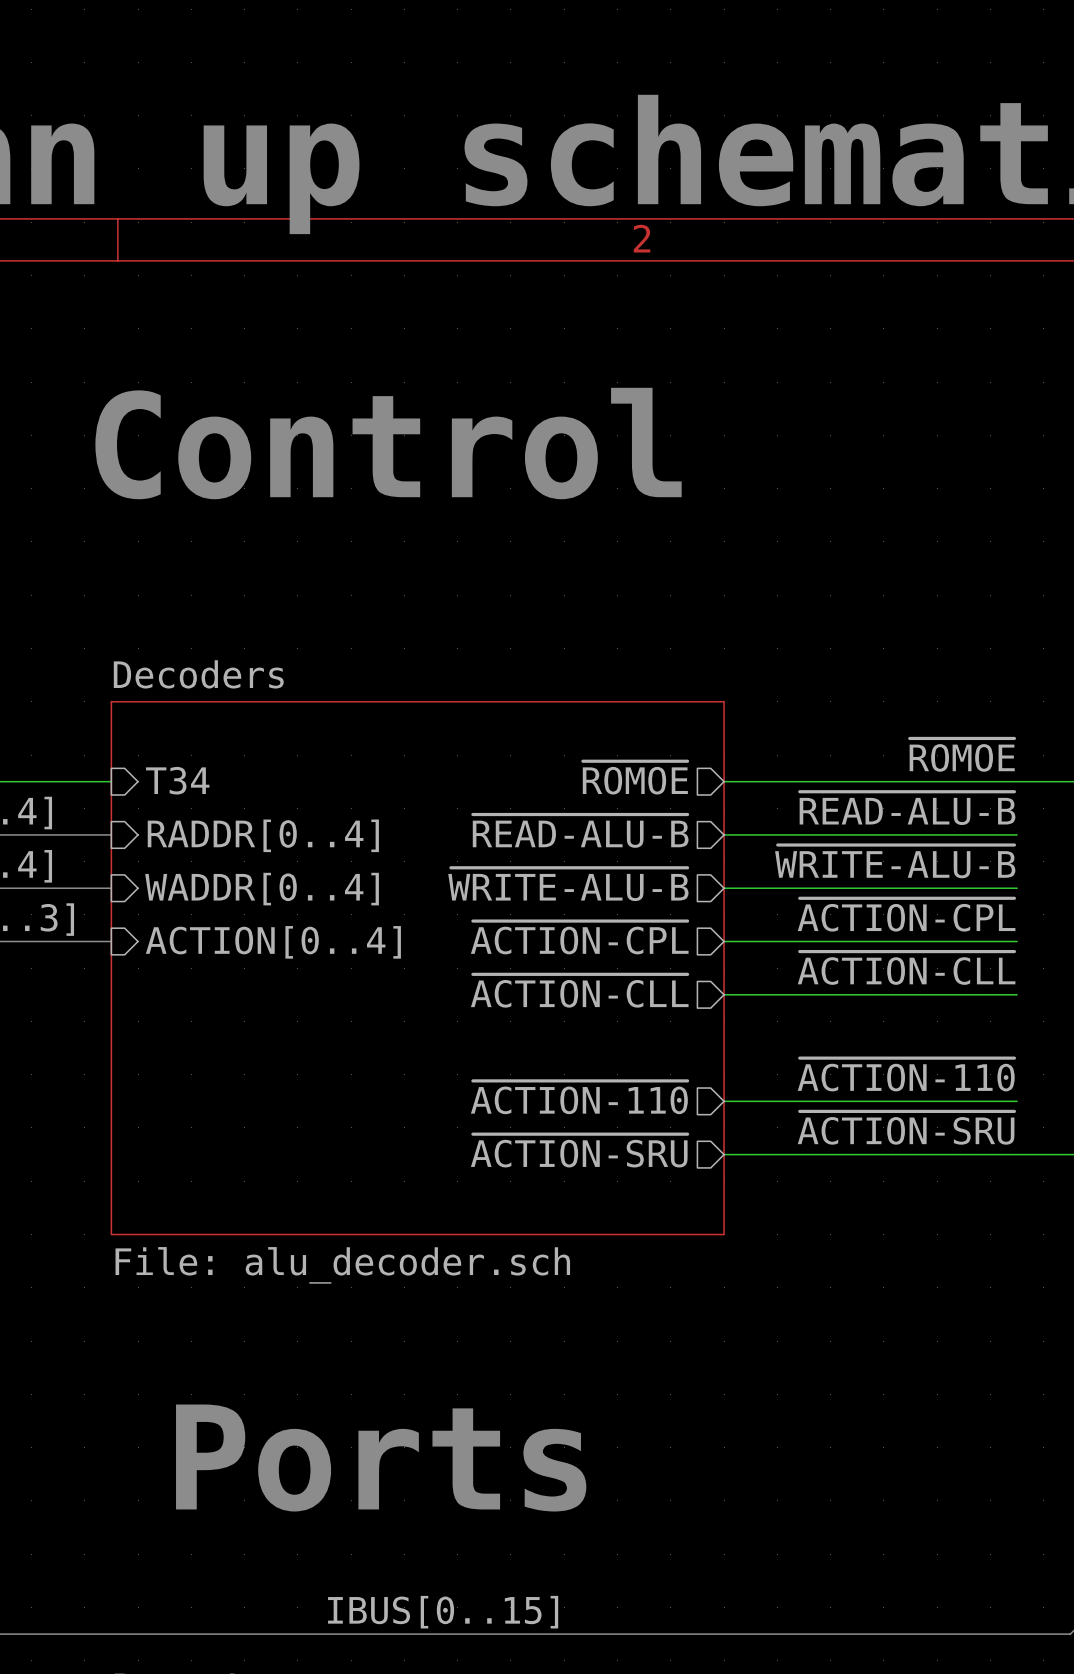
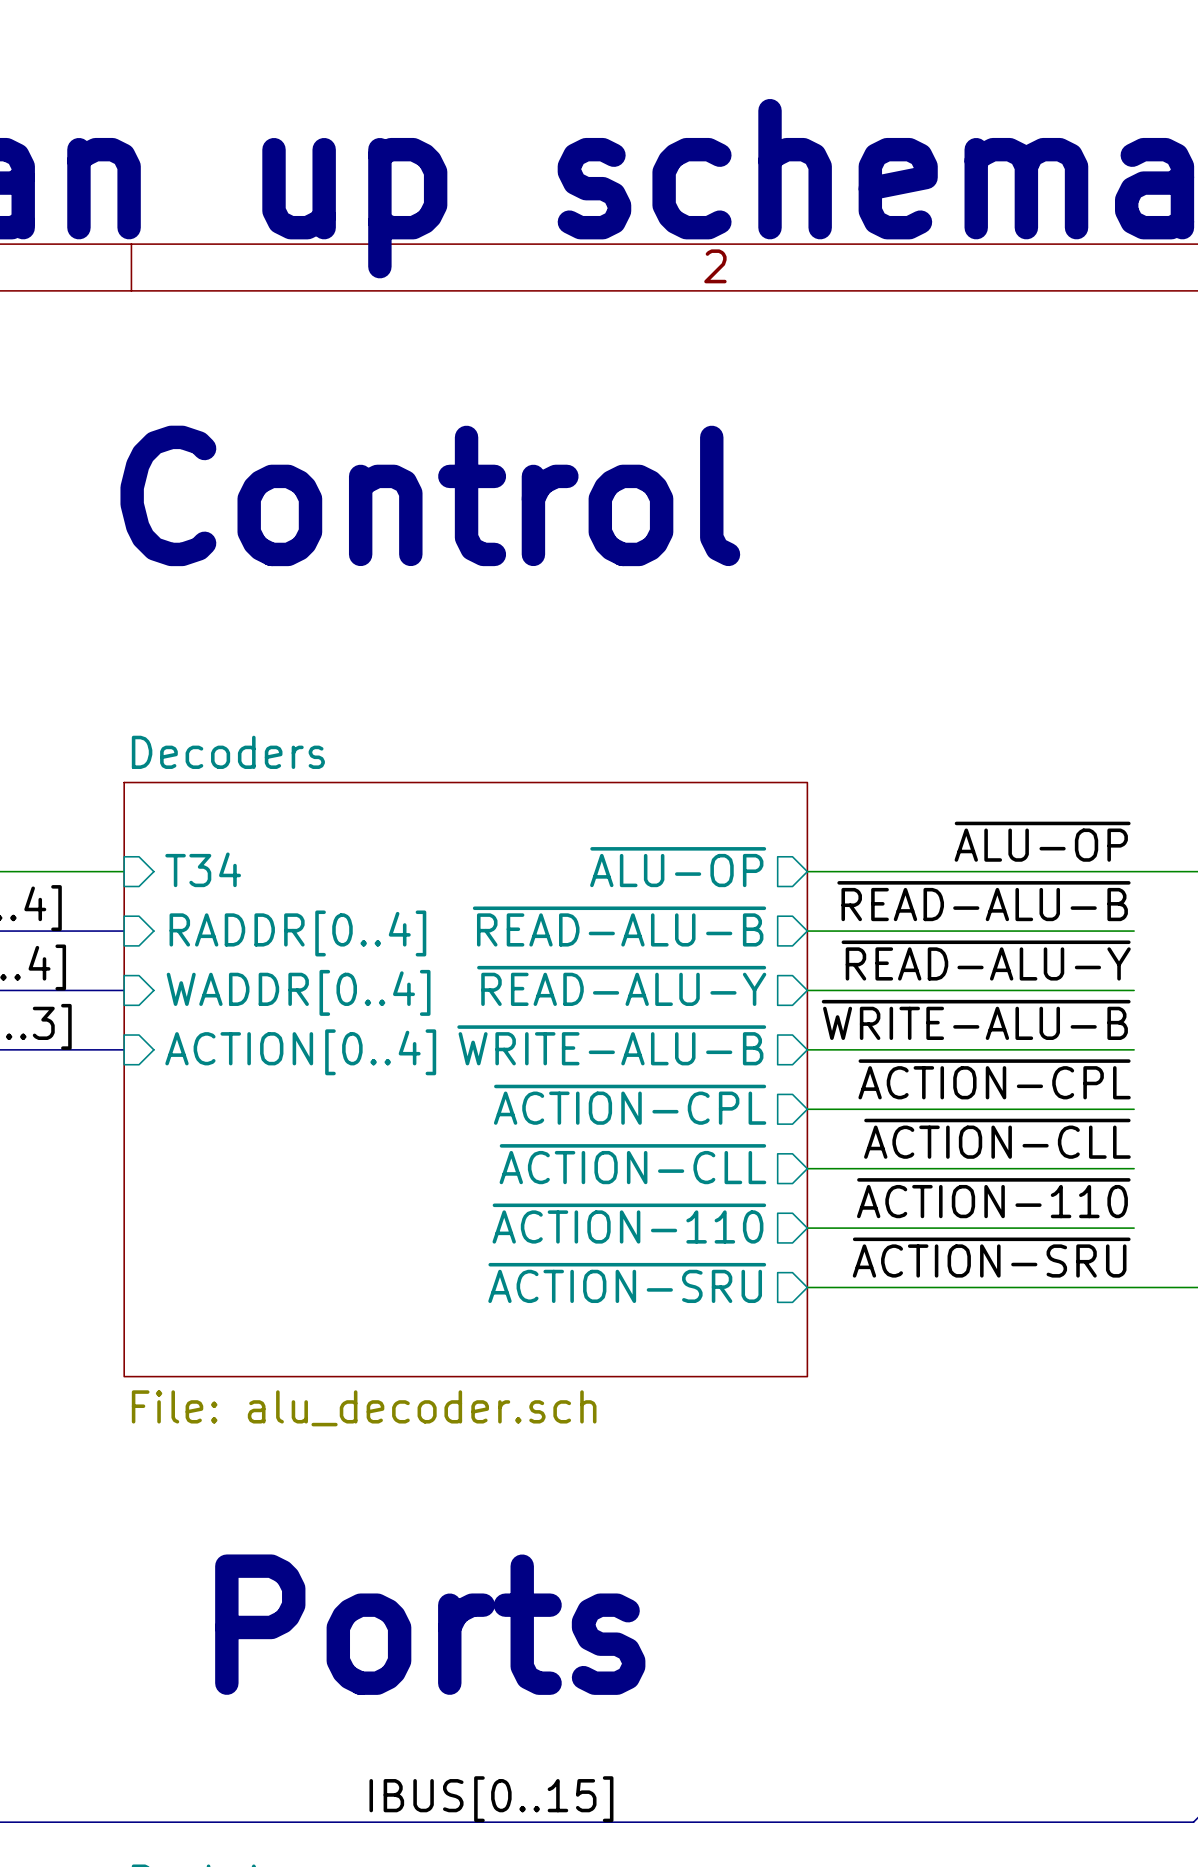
label: ~{ROMOE} (962, 755) -> ~{ALU-OP} (1042, 841)
sheet pin: ~{ROMOE} (635, 777) -> ~{ALU-OP} (678, 867)
label: ~{WRITE-ALU-B} (895, 861) -> ~{READ-ALU-Y} (986, 960)
sheet pin: ~{WRITE-ALU-B} (568, 884) -> ~{READ-ALU-Y} (621, 985)
label: ~{ACTION-CPL} (906, 914) -> ~{WRITE-ALU-B} (976, 1019)
sheet pin: ~{ACTION-CPL} (579, 937) -> ~{WRITE-ALU-B} (611, 1045)
label: ~{ACTION-CLL} (906, 968) -> ~{ACTION-CPL} (994, 1079)
sheet pin: ~{ACTION-CLL} (579, 990) -> ~{ACTION-CPL} (630, 1104)
label: none -> ~{ACTION-CLL} (997, 1138)
sheet pin: none -> ~{ACTION-CLL} (632, 1164)
wire: none -> (807, 1168) (1134, 1168)

